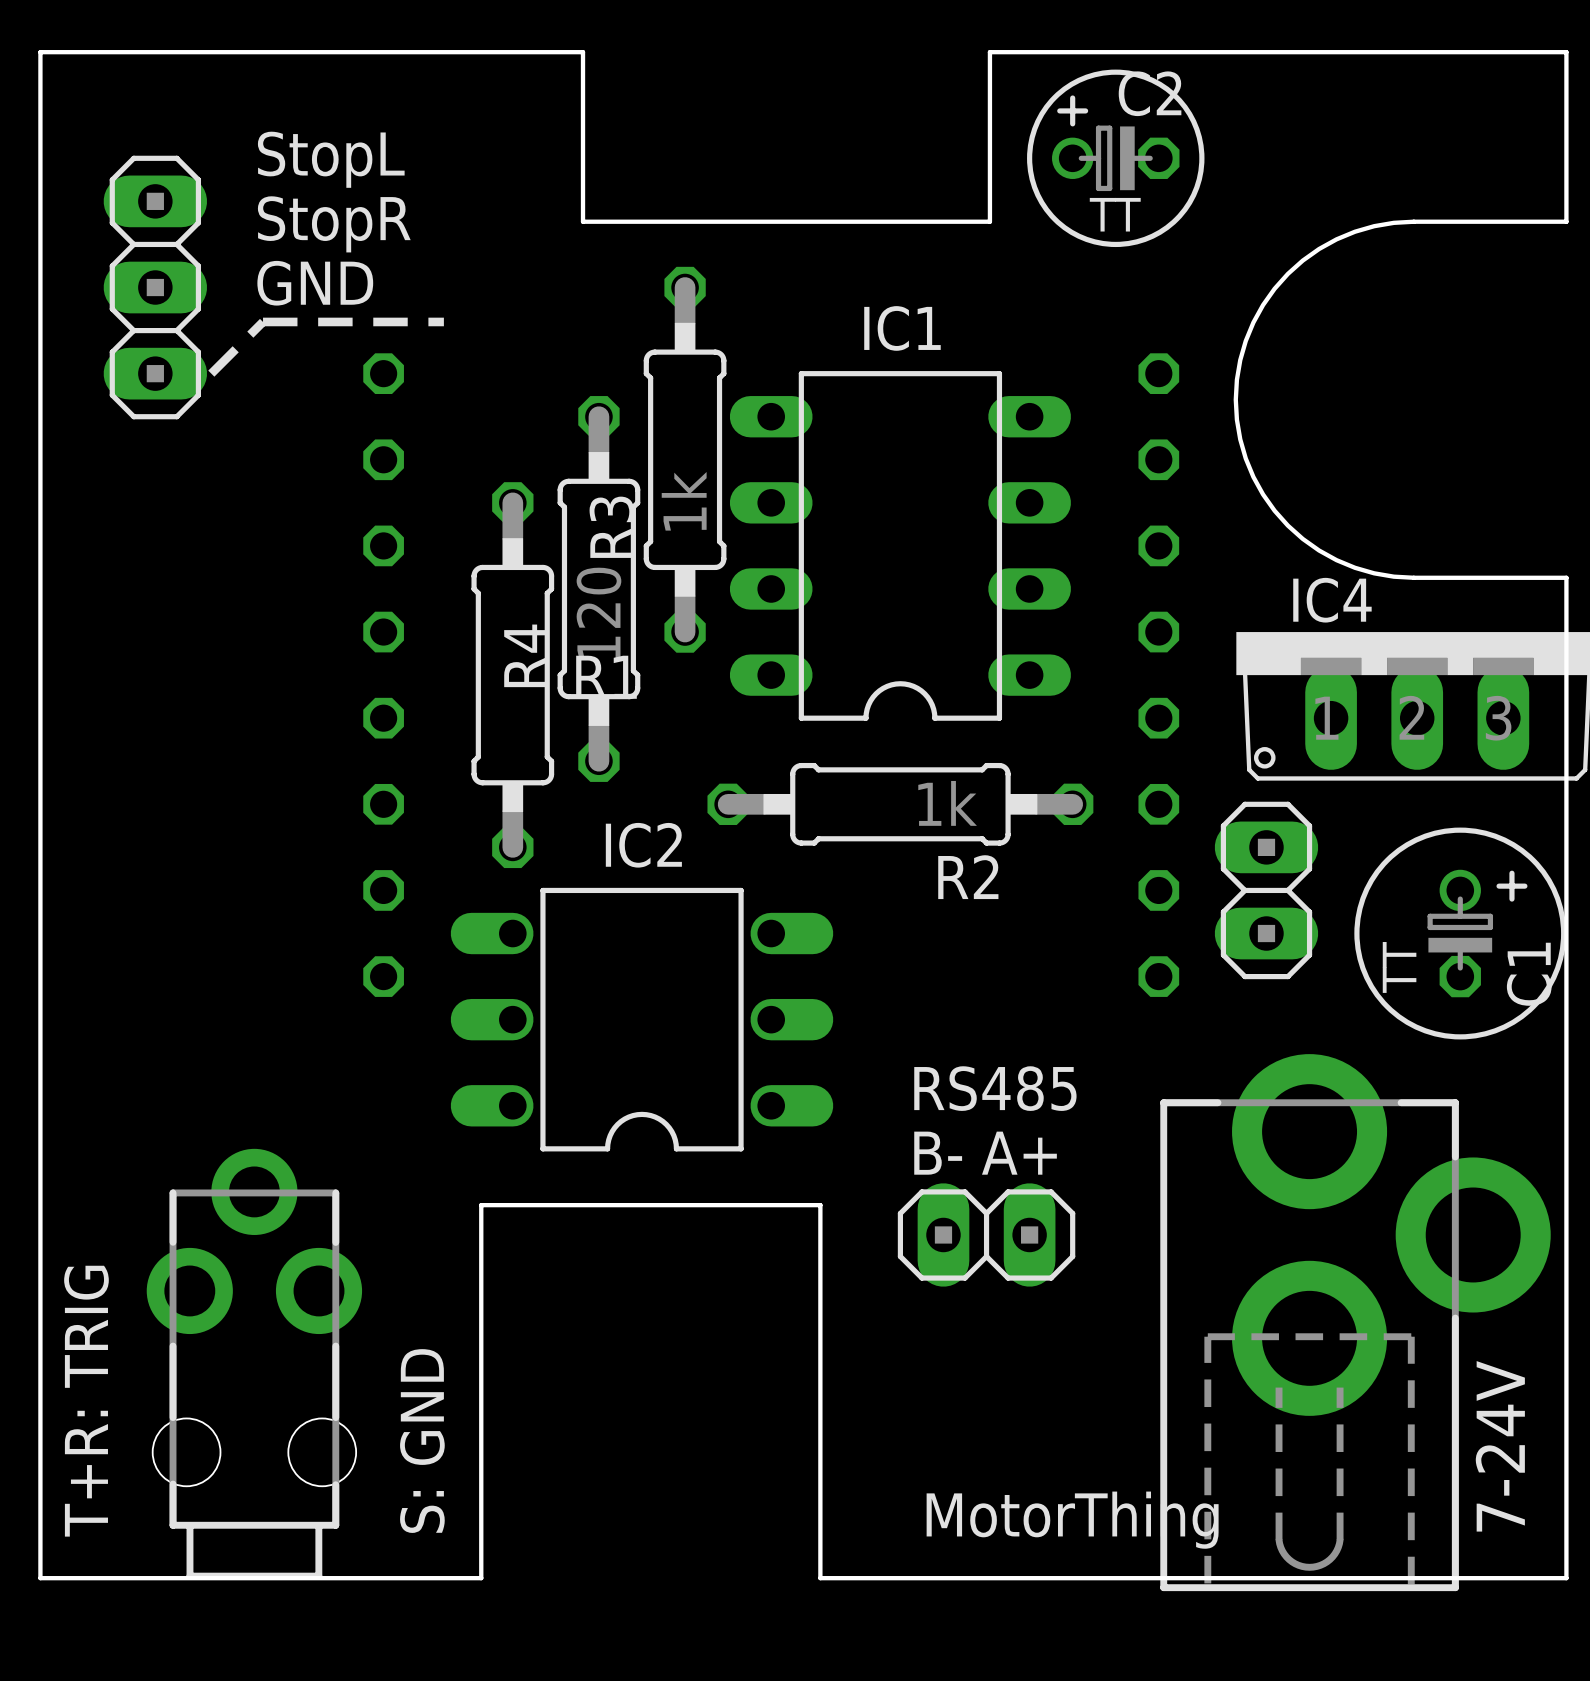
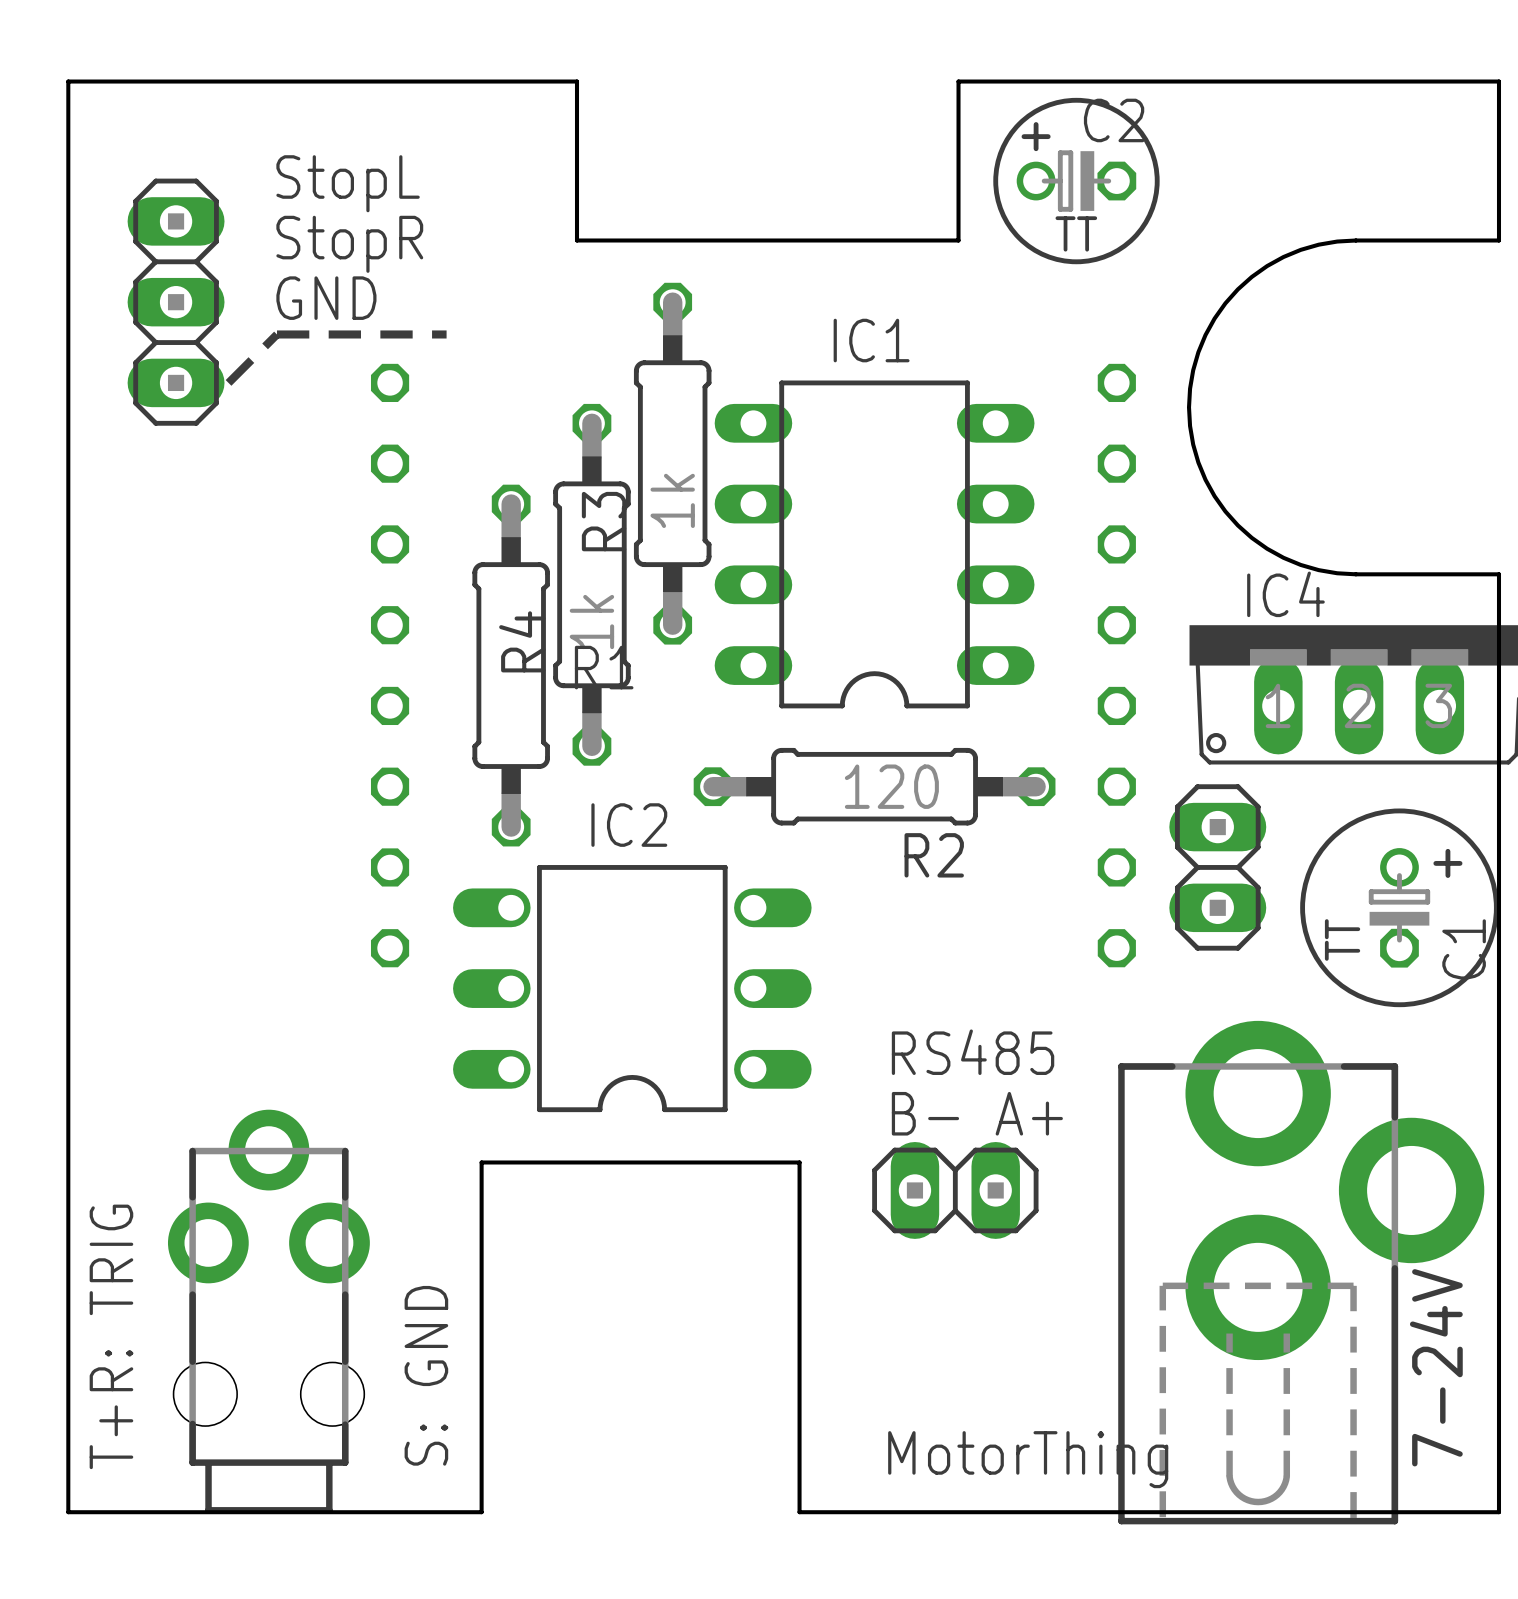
R4 value: 120 (598, 613) -> 1k (591, 622)
R2 value: 1k (947, 803) -> 120 (891, 786)

